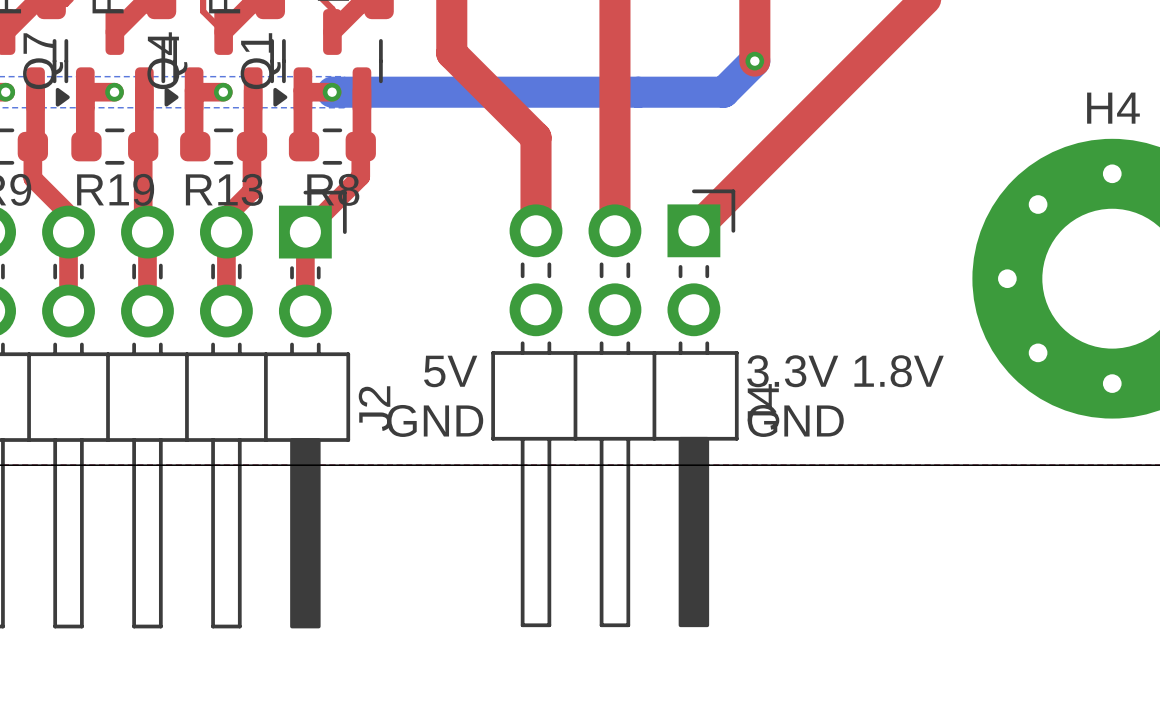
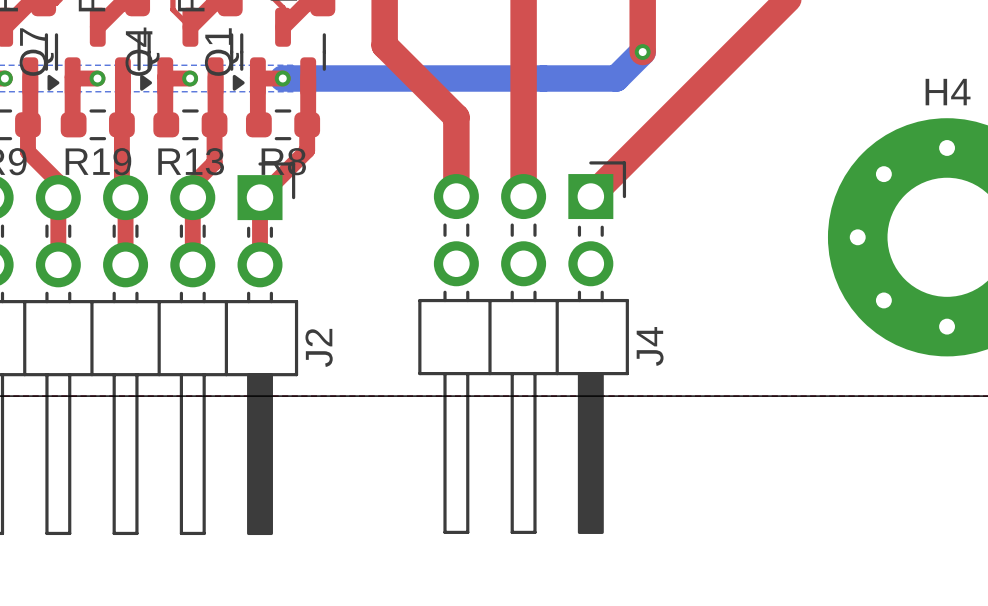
text: 5V (450, 371) -> none
text: 3.3V 1.8V (845, 371) -> none
text: GND (435, 420) -> none
text: GND (795, 420) -> none

